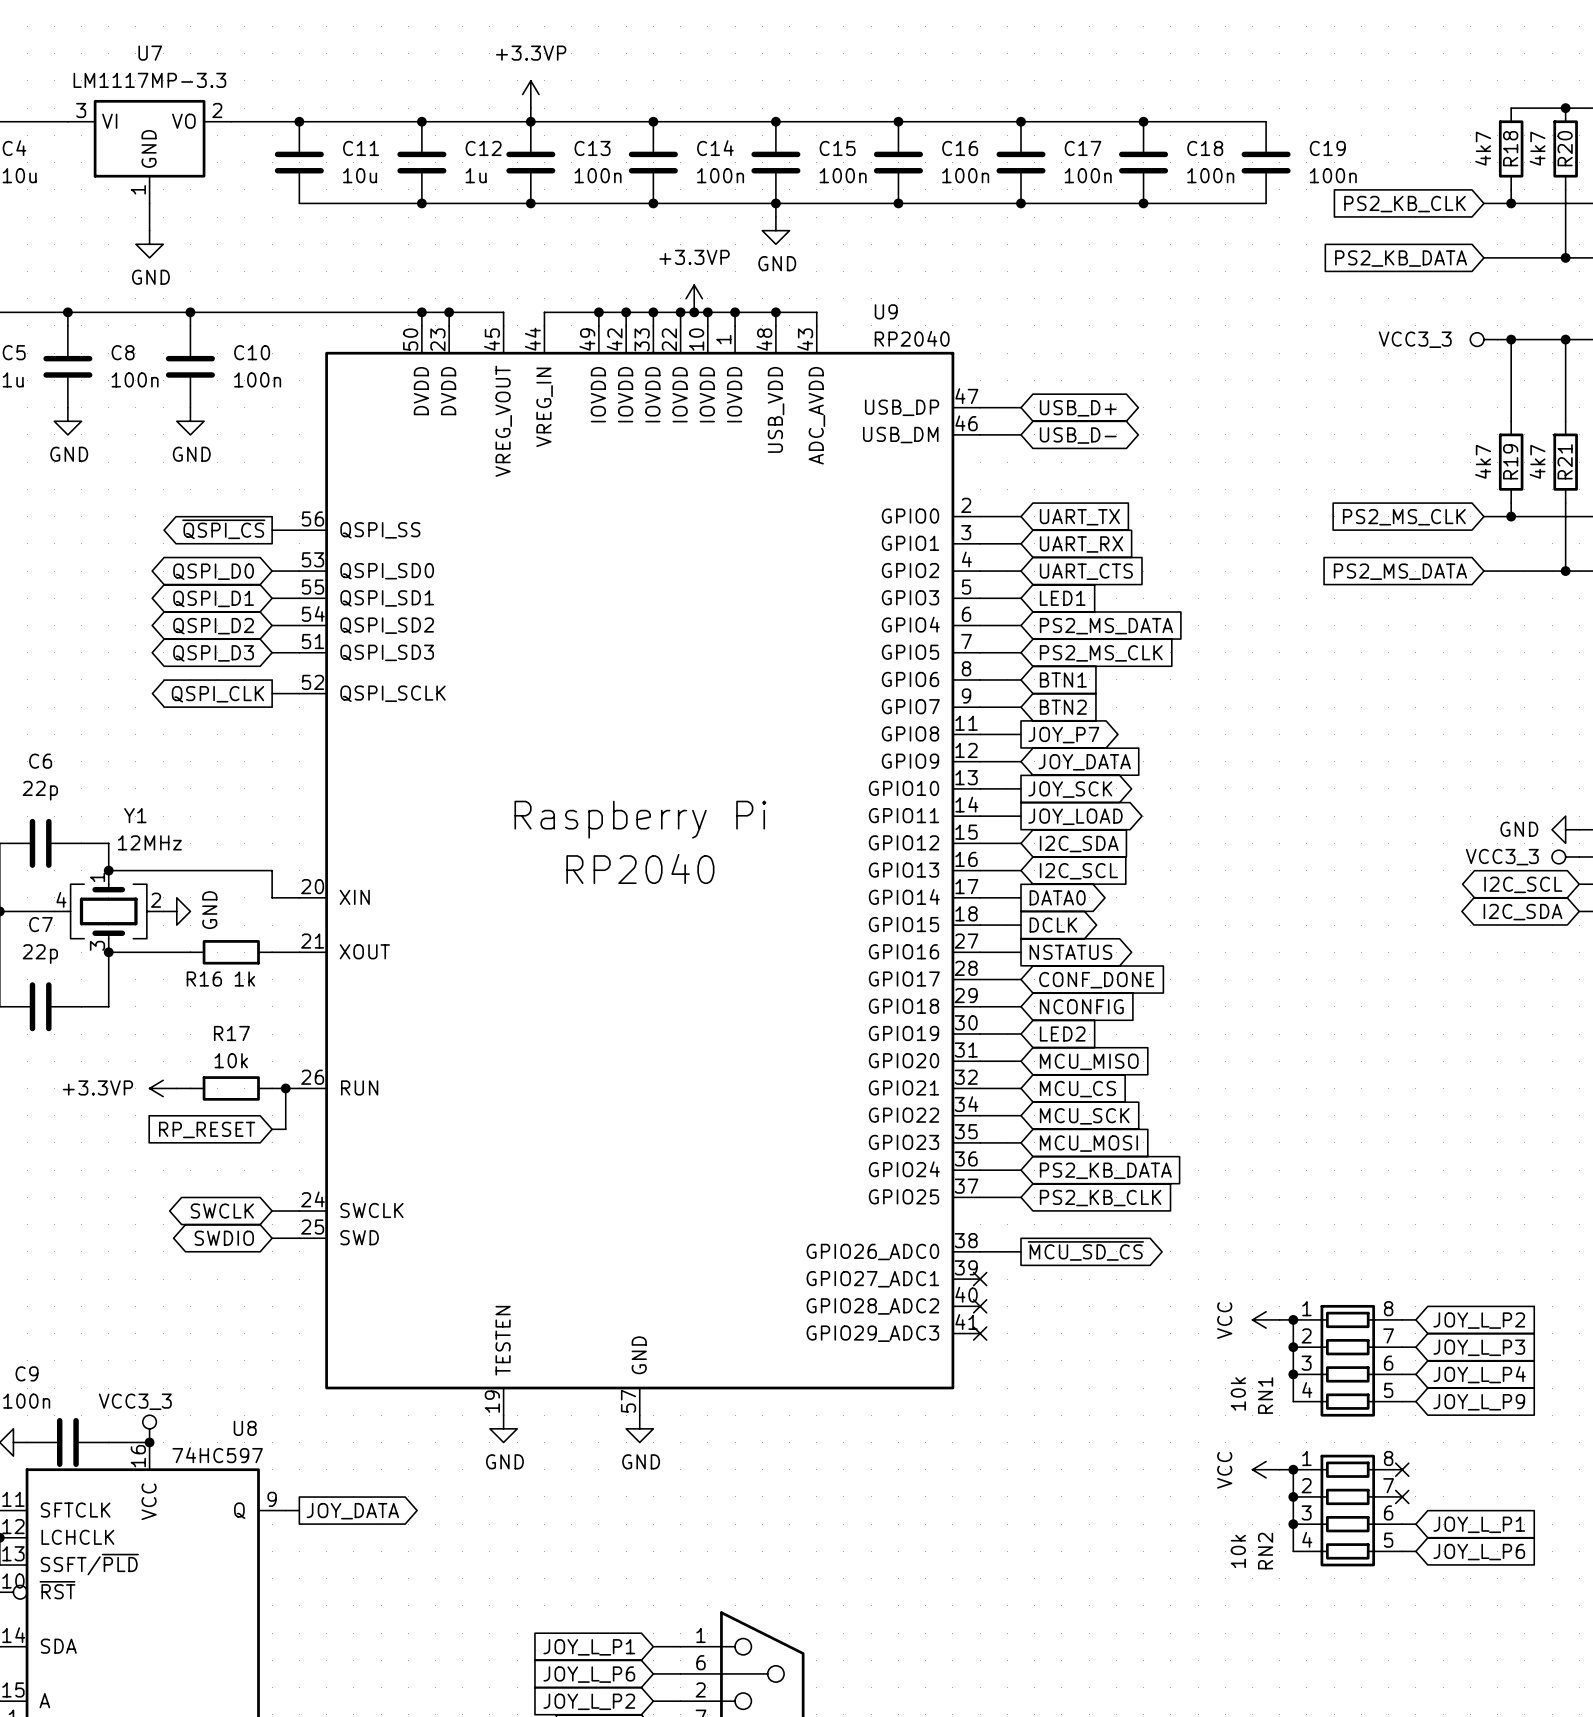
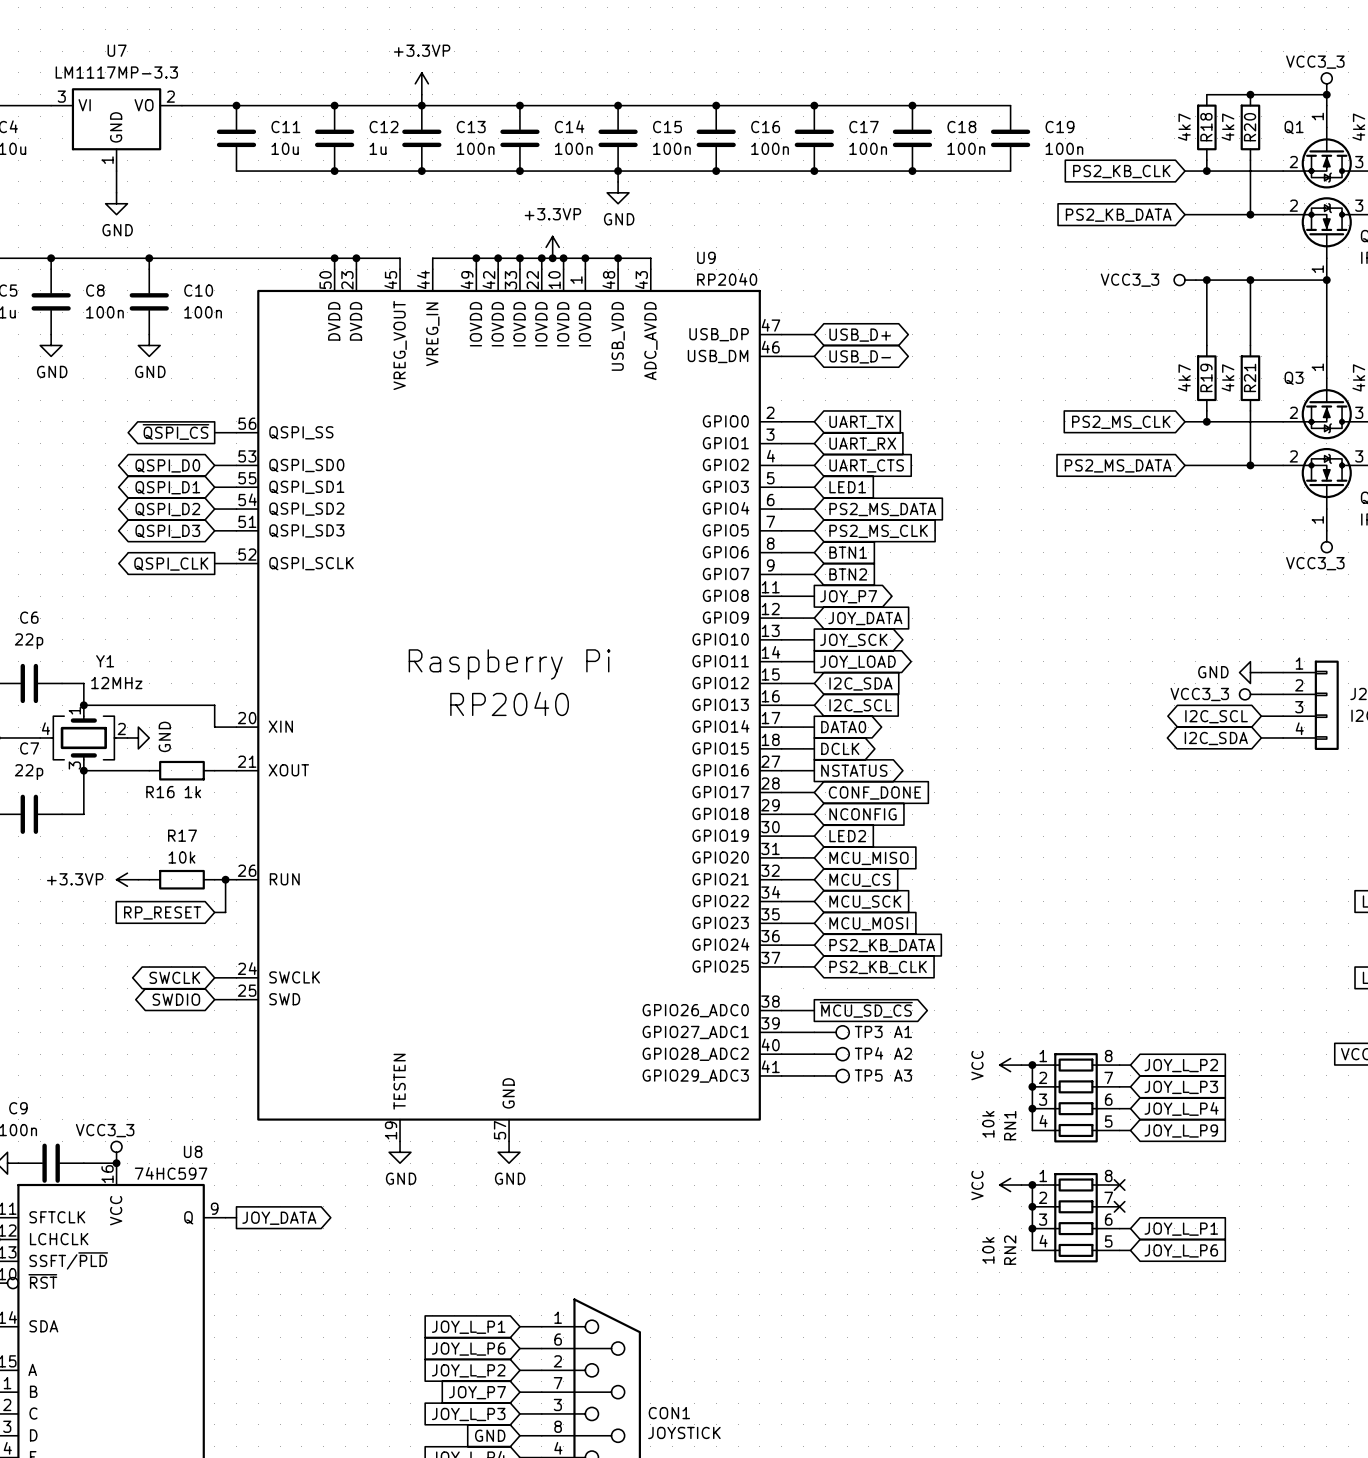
wire: none -> (781, 1032) (814, 1032)
no-connect mark: (980, 1279) -> none
TP3: none -> A1 (831, 1032)
wire: none -> (781, 1054) (814, 1054)
no-connect mark: (980, 1306) -> none
TP4: none -> A2 (831, 1054)
wire: none -> (781, 1075) (814, 1075)
no-connect mark: (980, 1333) -> none
TP5: none -> A3 (831, 1075)

